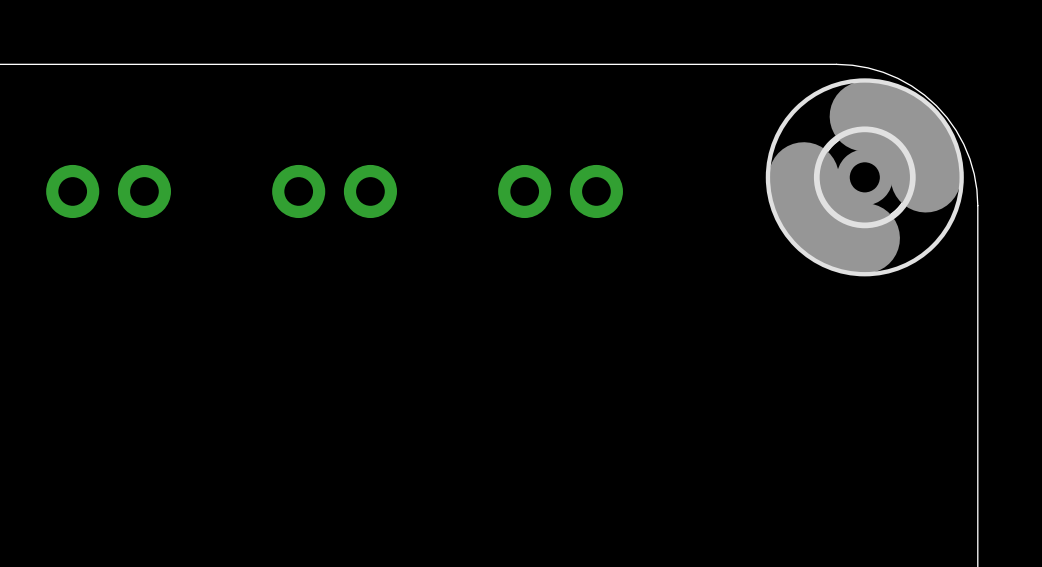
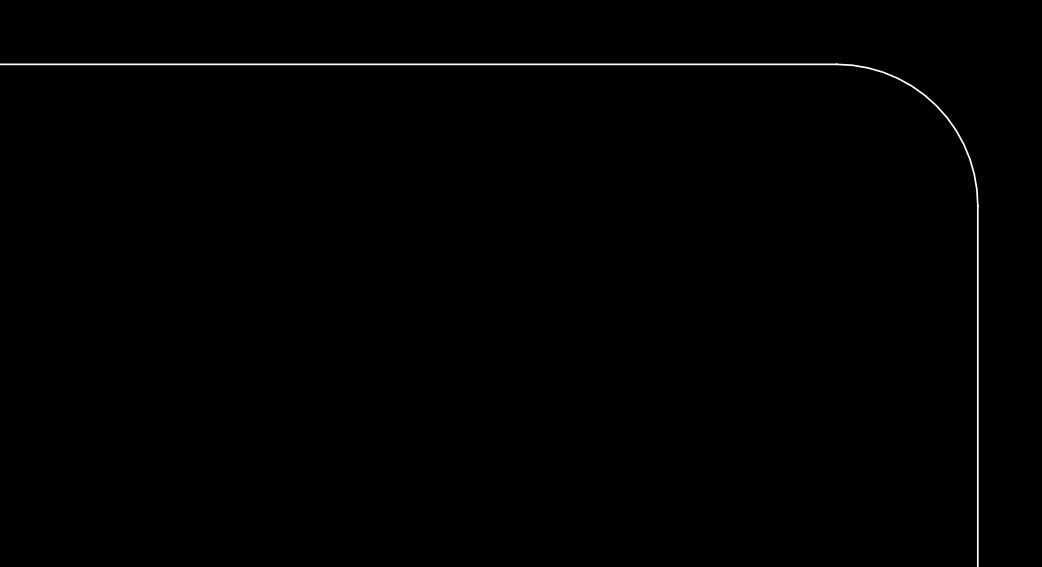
part: (864, 177) -> none
part: (108, 191) -> none
part: (334, 191) -> none
part: (560, 191) -> none

